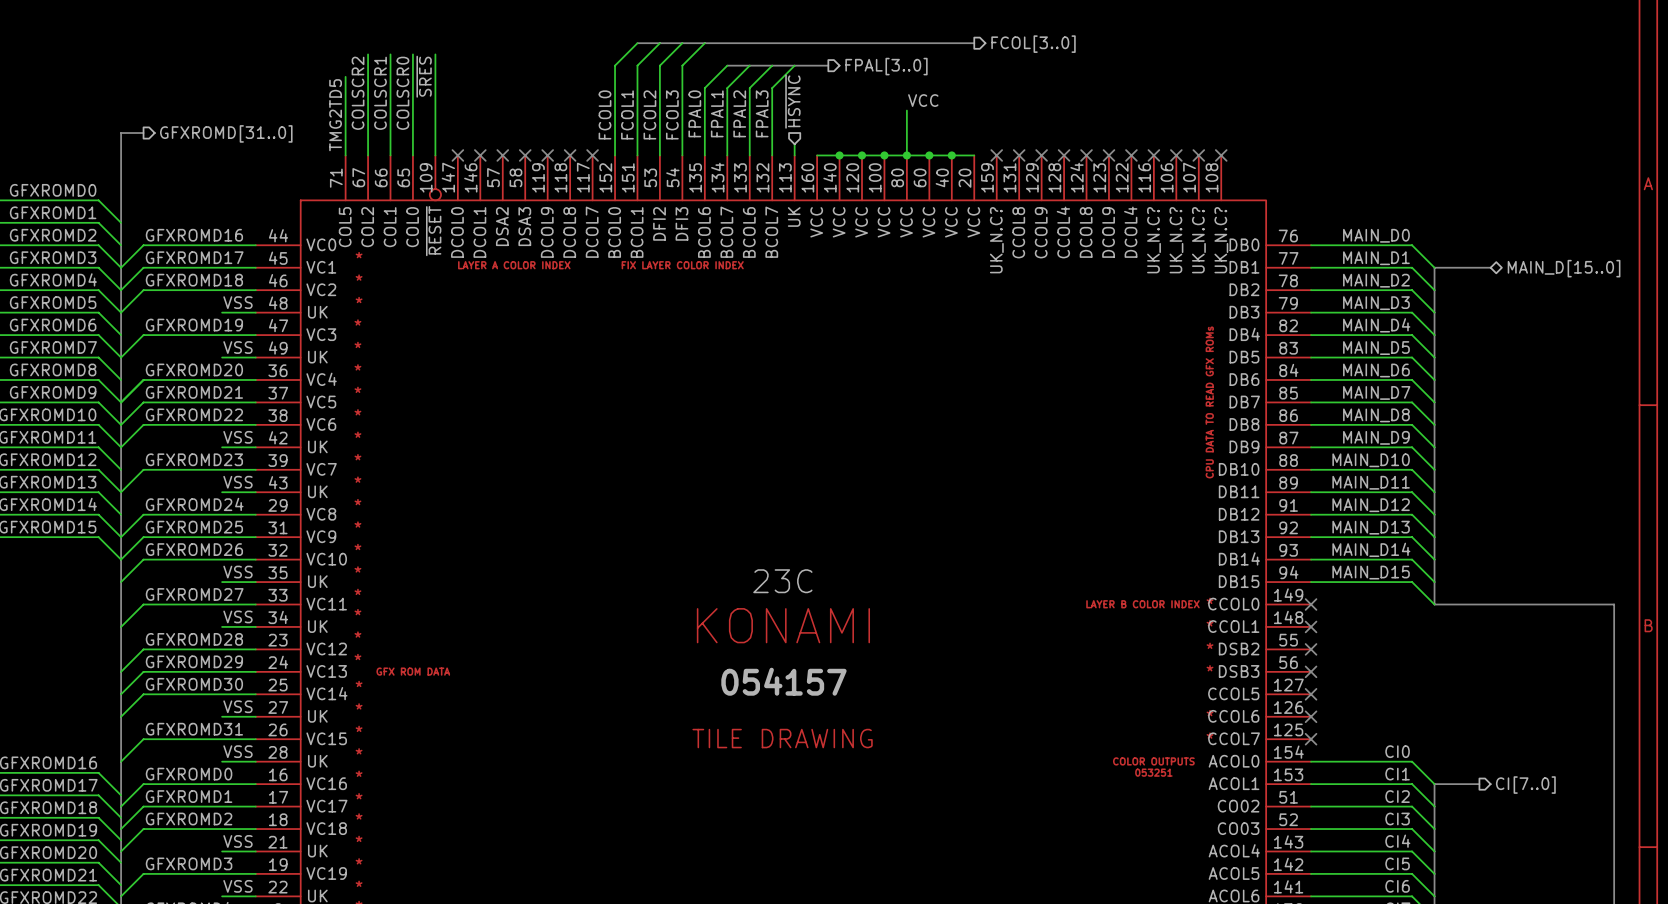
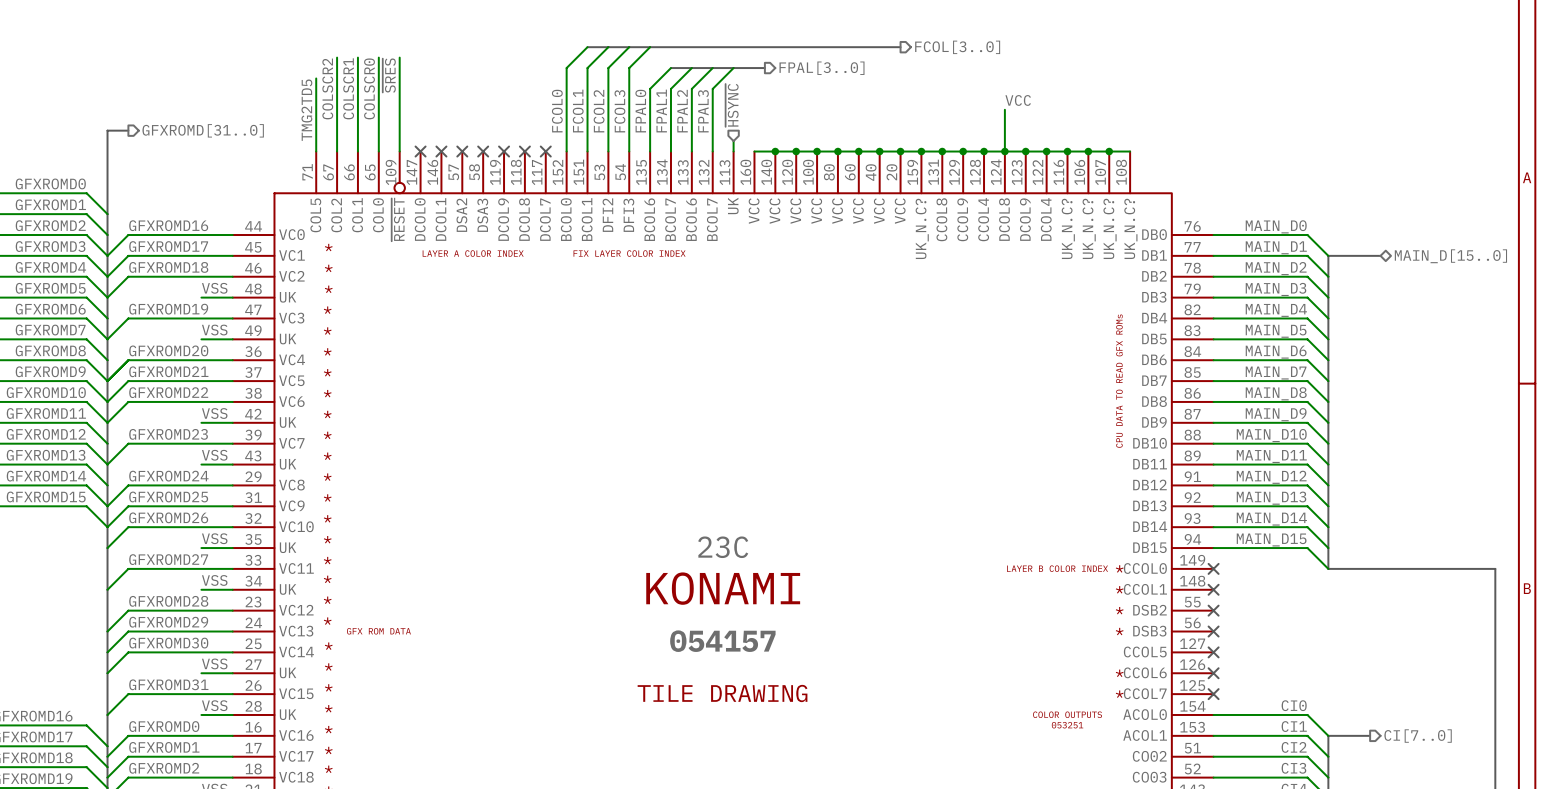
label position: VCC (923, 100) -> VCC (1018, 100)
wire: (906, 110) (906, 155) -> (1004, 109) (1004, 151)
wire: none -> (900, 151) (1130, 151)
junction: none -> (900, 151)
no-connect mark: (996, 155) -> none
junction: none -> (921, 151)
no-connect mark: (1019, 155) -> none
junction: none -> (942, 151)
no-connect mark: (1041, 155) -> none
junction: none -> (963, 151)
no-connect mark: (1064, 155) -> none
junction: none -> (984, 151)
no-connect mark: (1086, 155) -> none
junction: none -> (1004, 151)
no-connect mark: (1108, 155) -> none
junction: none -> (1025, 151)
no-connect mark: (1131, 155) -> none
junction: none -> (1046, 151)
no-connect mark: (1153, 155) -> none
junction: none -> (1067, 151)
no-connect mark: (1176, 155) -> none
junction: none -> (1088, 151)
no-connect mark: (1198, 155) -> none
junction: none -> (1109, 151)
no-connect mark: (1221, 155) -> none

